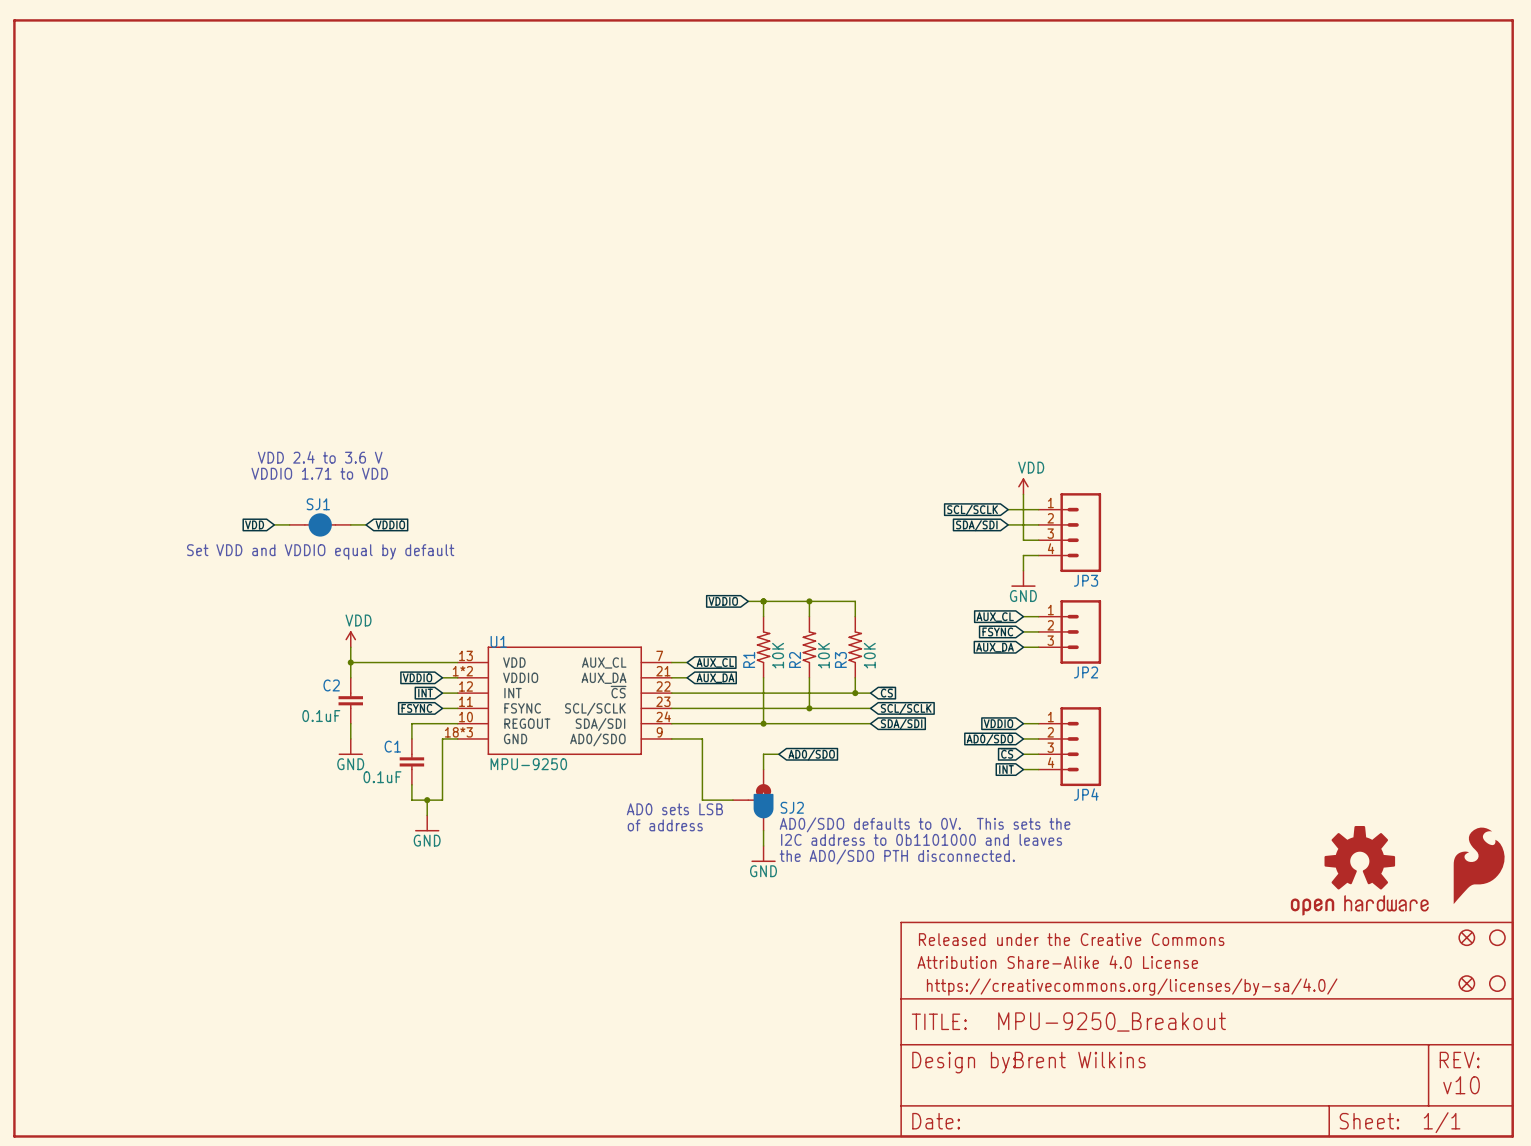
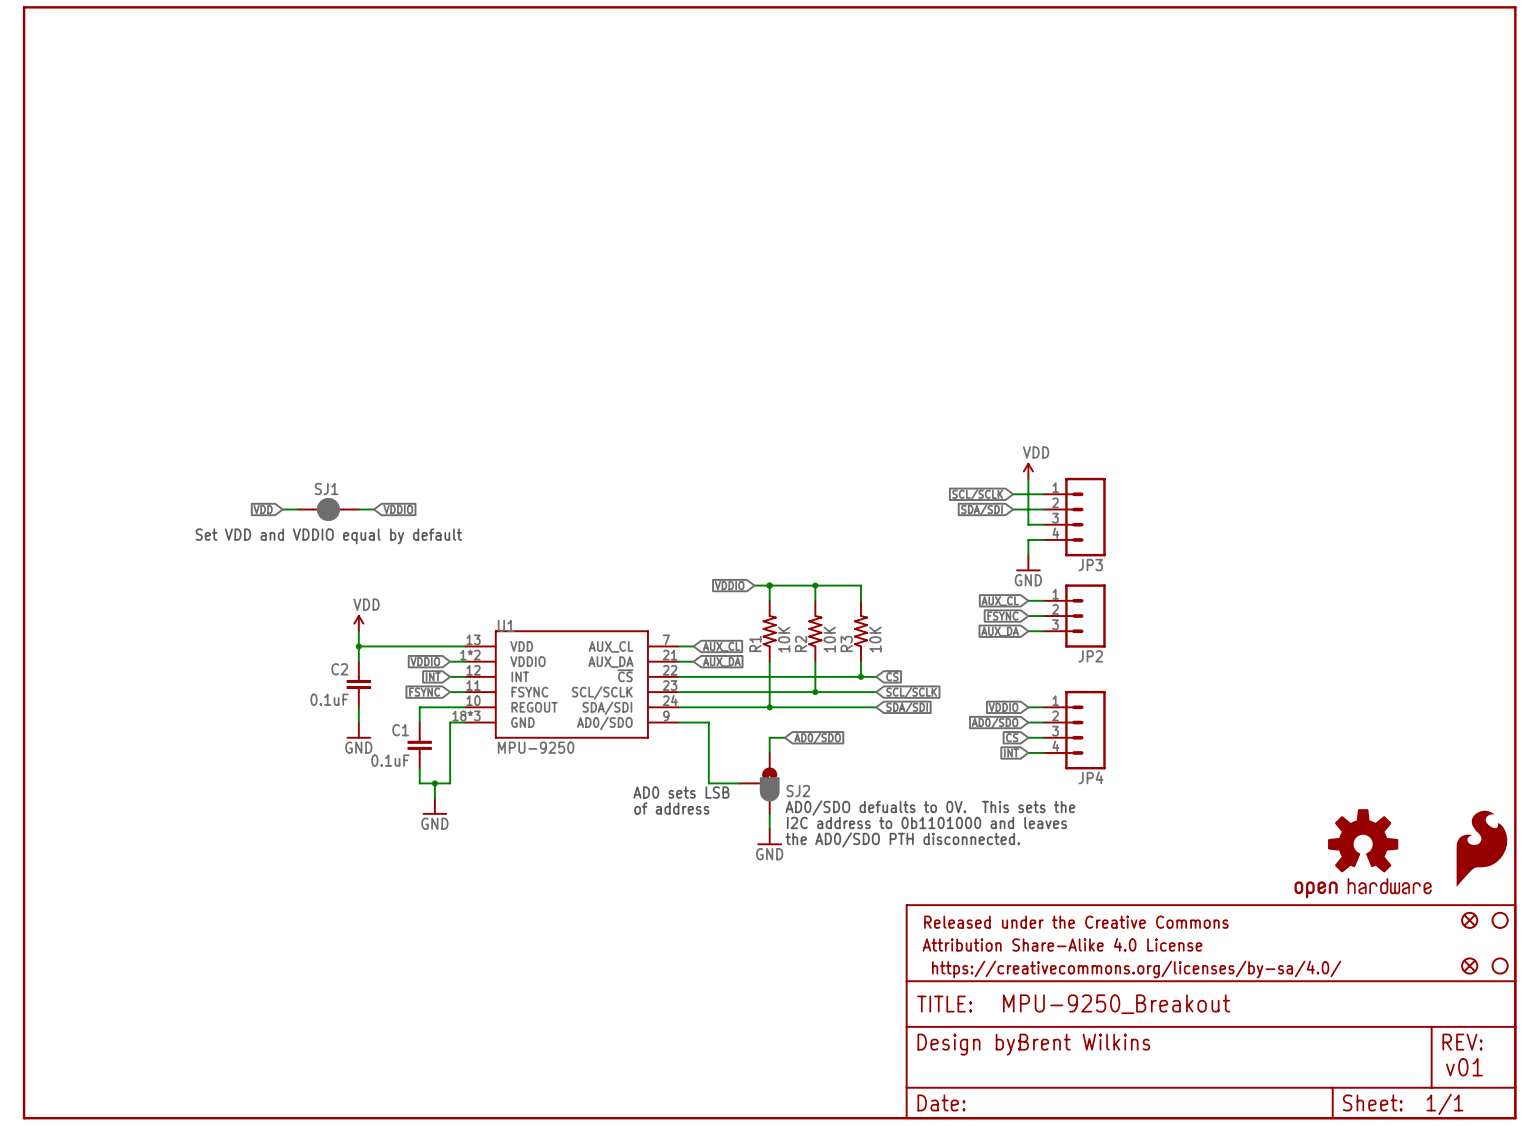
text: VDD 2.4 to 3.6 V (320, 457) -> none
text: VDDIO 1.71 to VDD (319, 473) -> none
text: AD0/SDO defaults to 0V. This sets the (925, 824) -> AD0/SDO defualts to 0V. This sets the (930, 808)
text: v10 (1461, 1085) -> v01 (1464, 1067)

